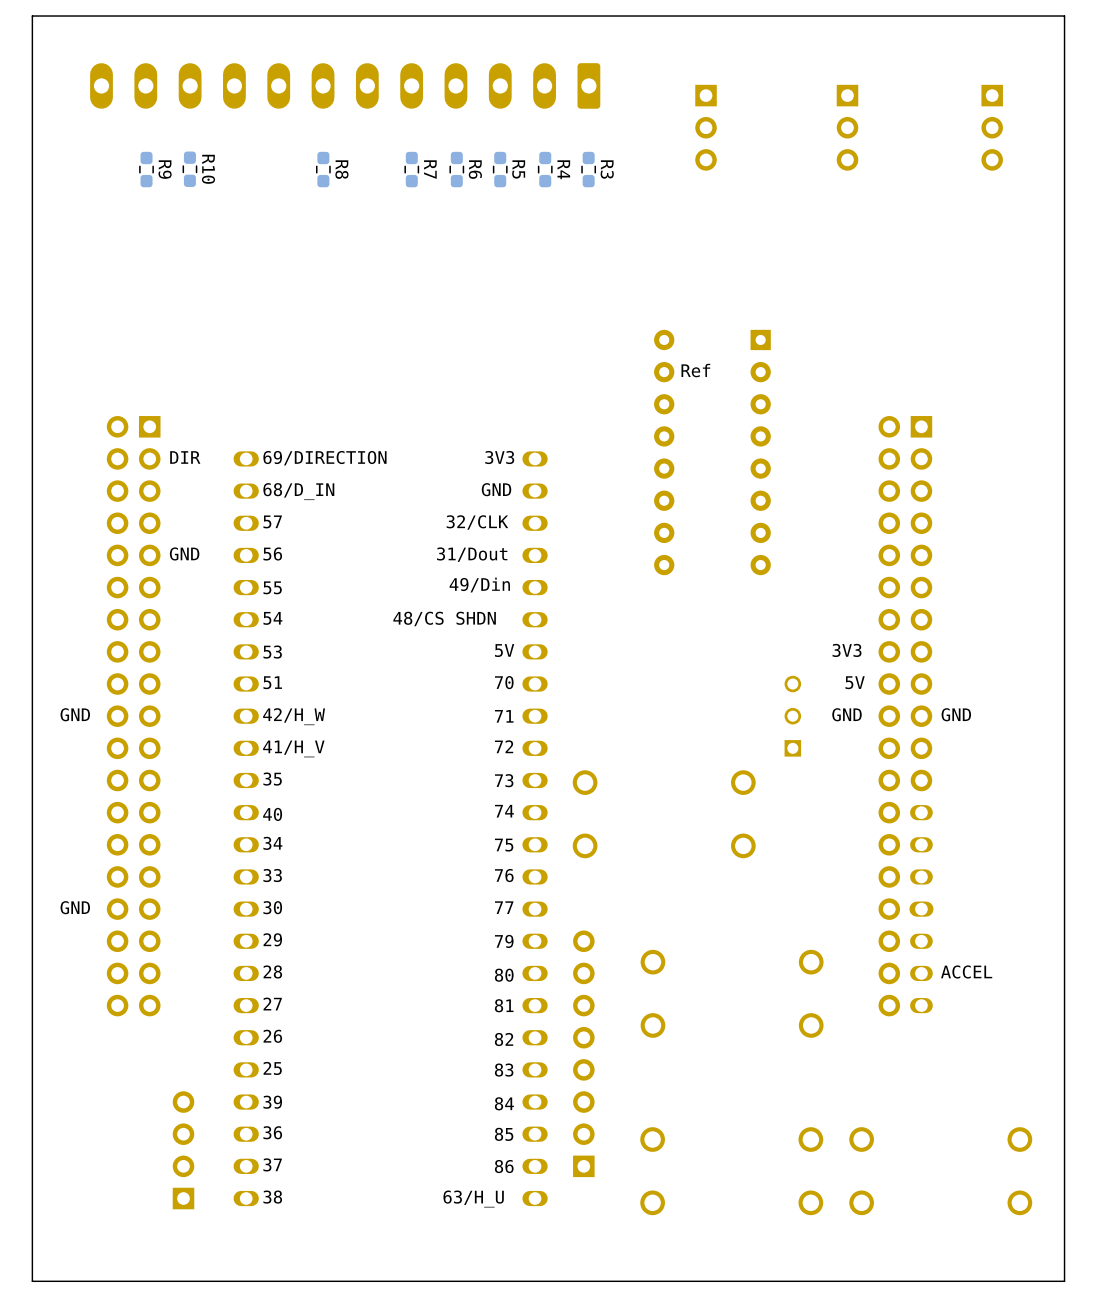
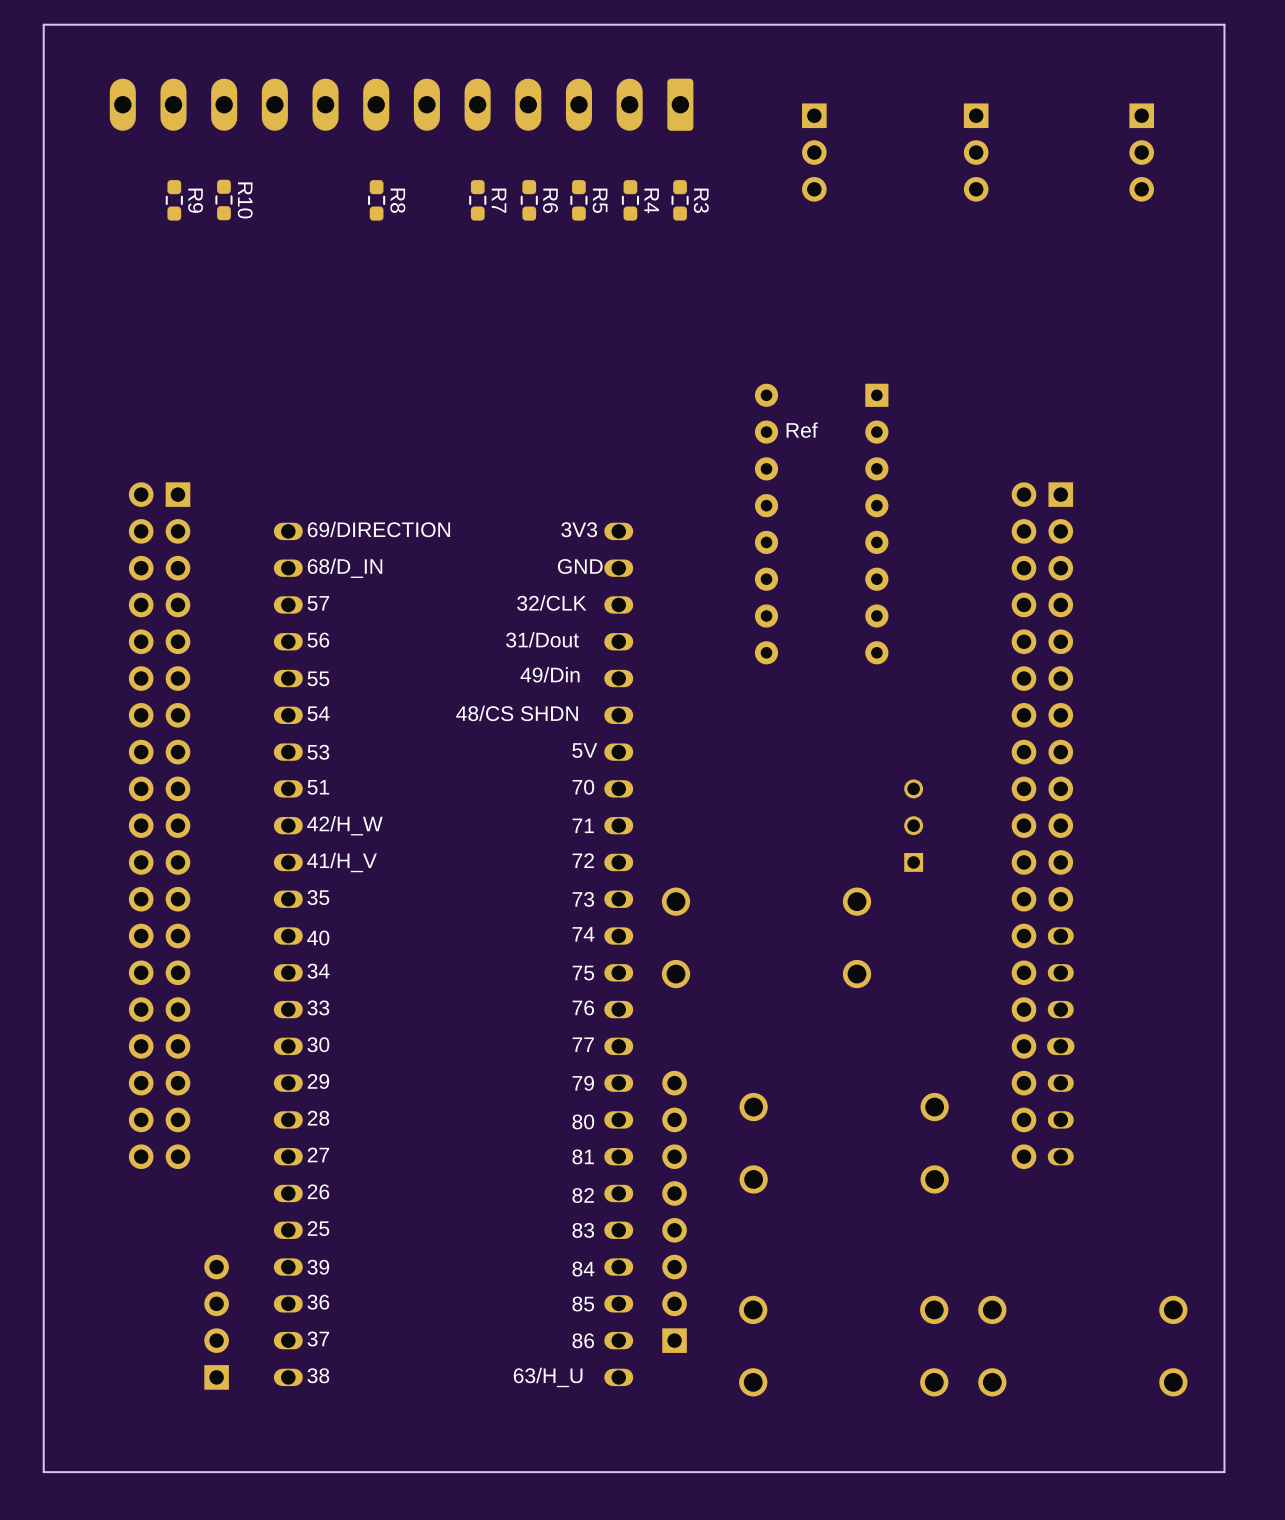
text: DIR (185, 457) -> none
text: GND (184, 553) -> none
text: 3V3 (847, 650) -> none
text: 5V (855, 682) -> none
text: GND (75, 714) -> none
text: GND (846, 714) -> none
text: GND (956, 714) -> none
text: GND (75, 907) -> none
text: ACCEL (966, 971) -> none

